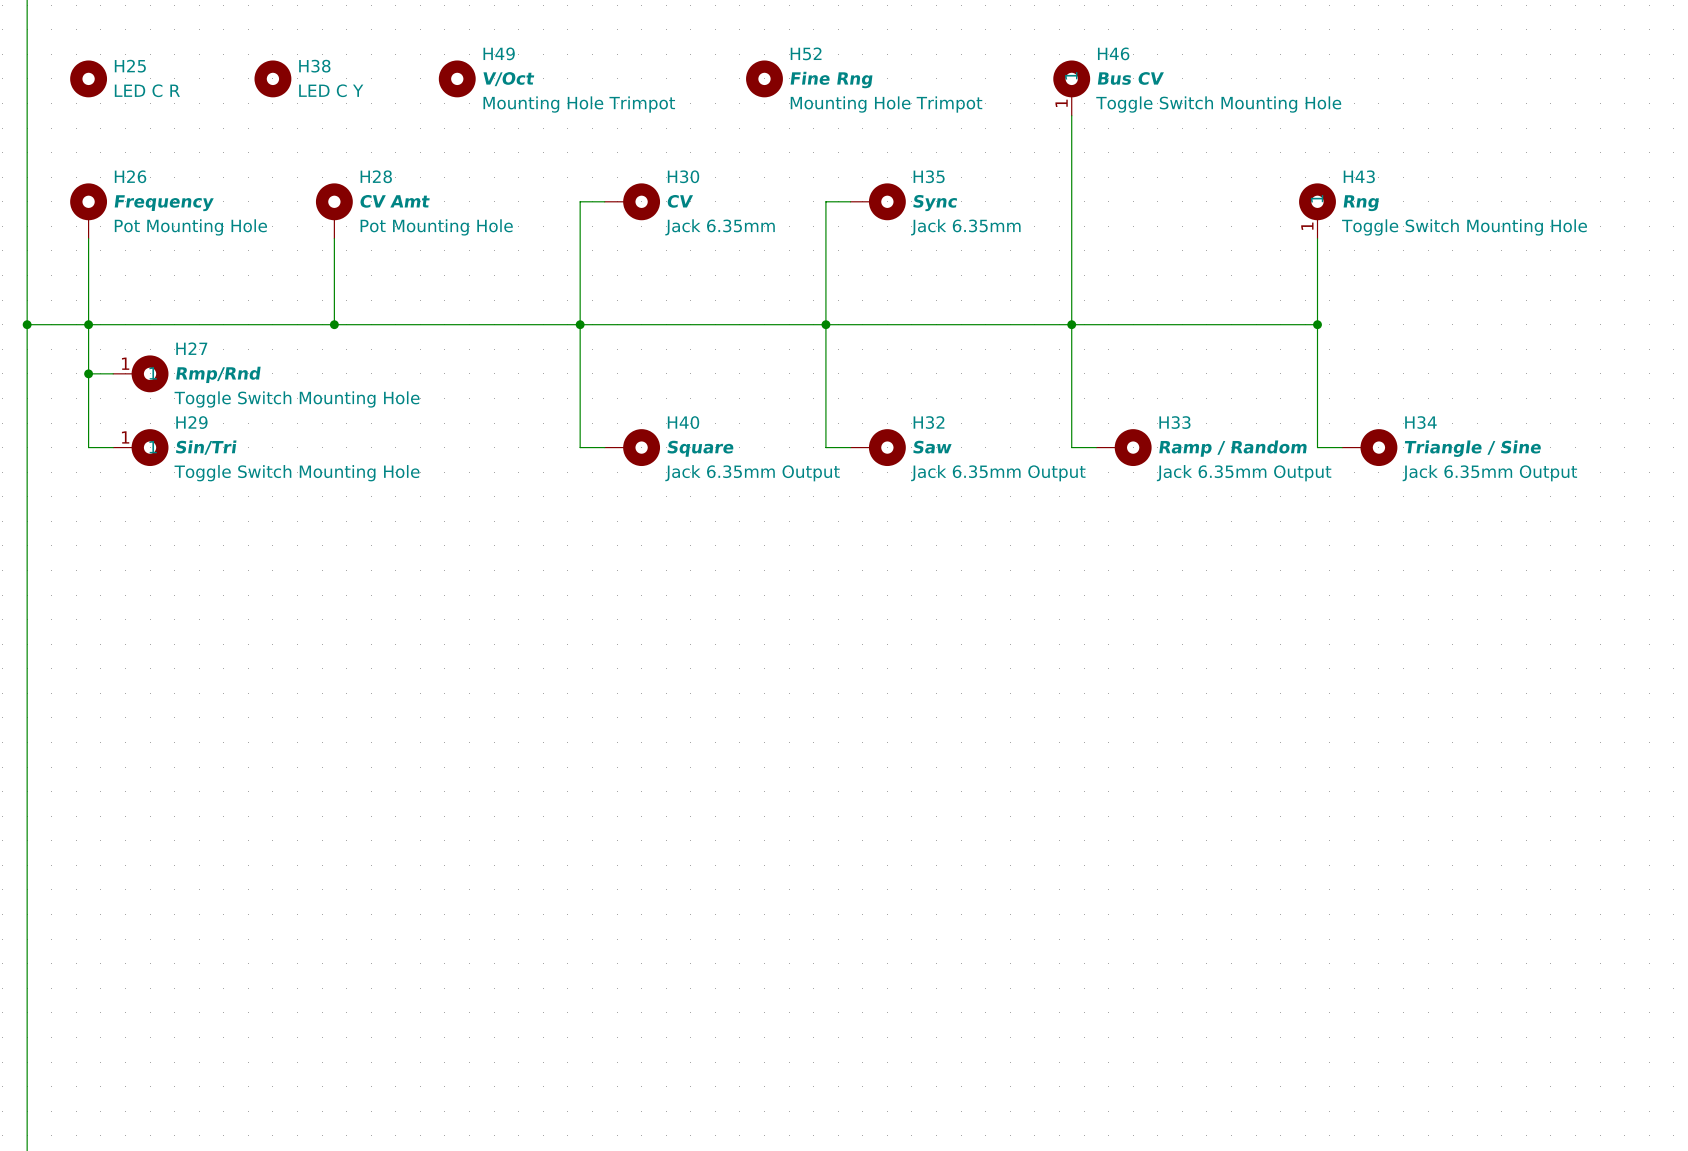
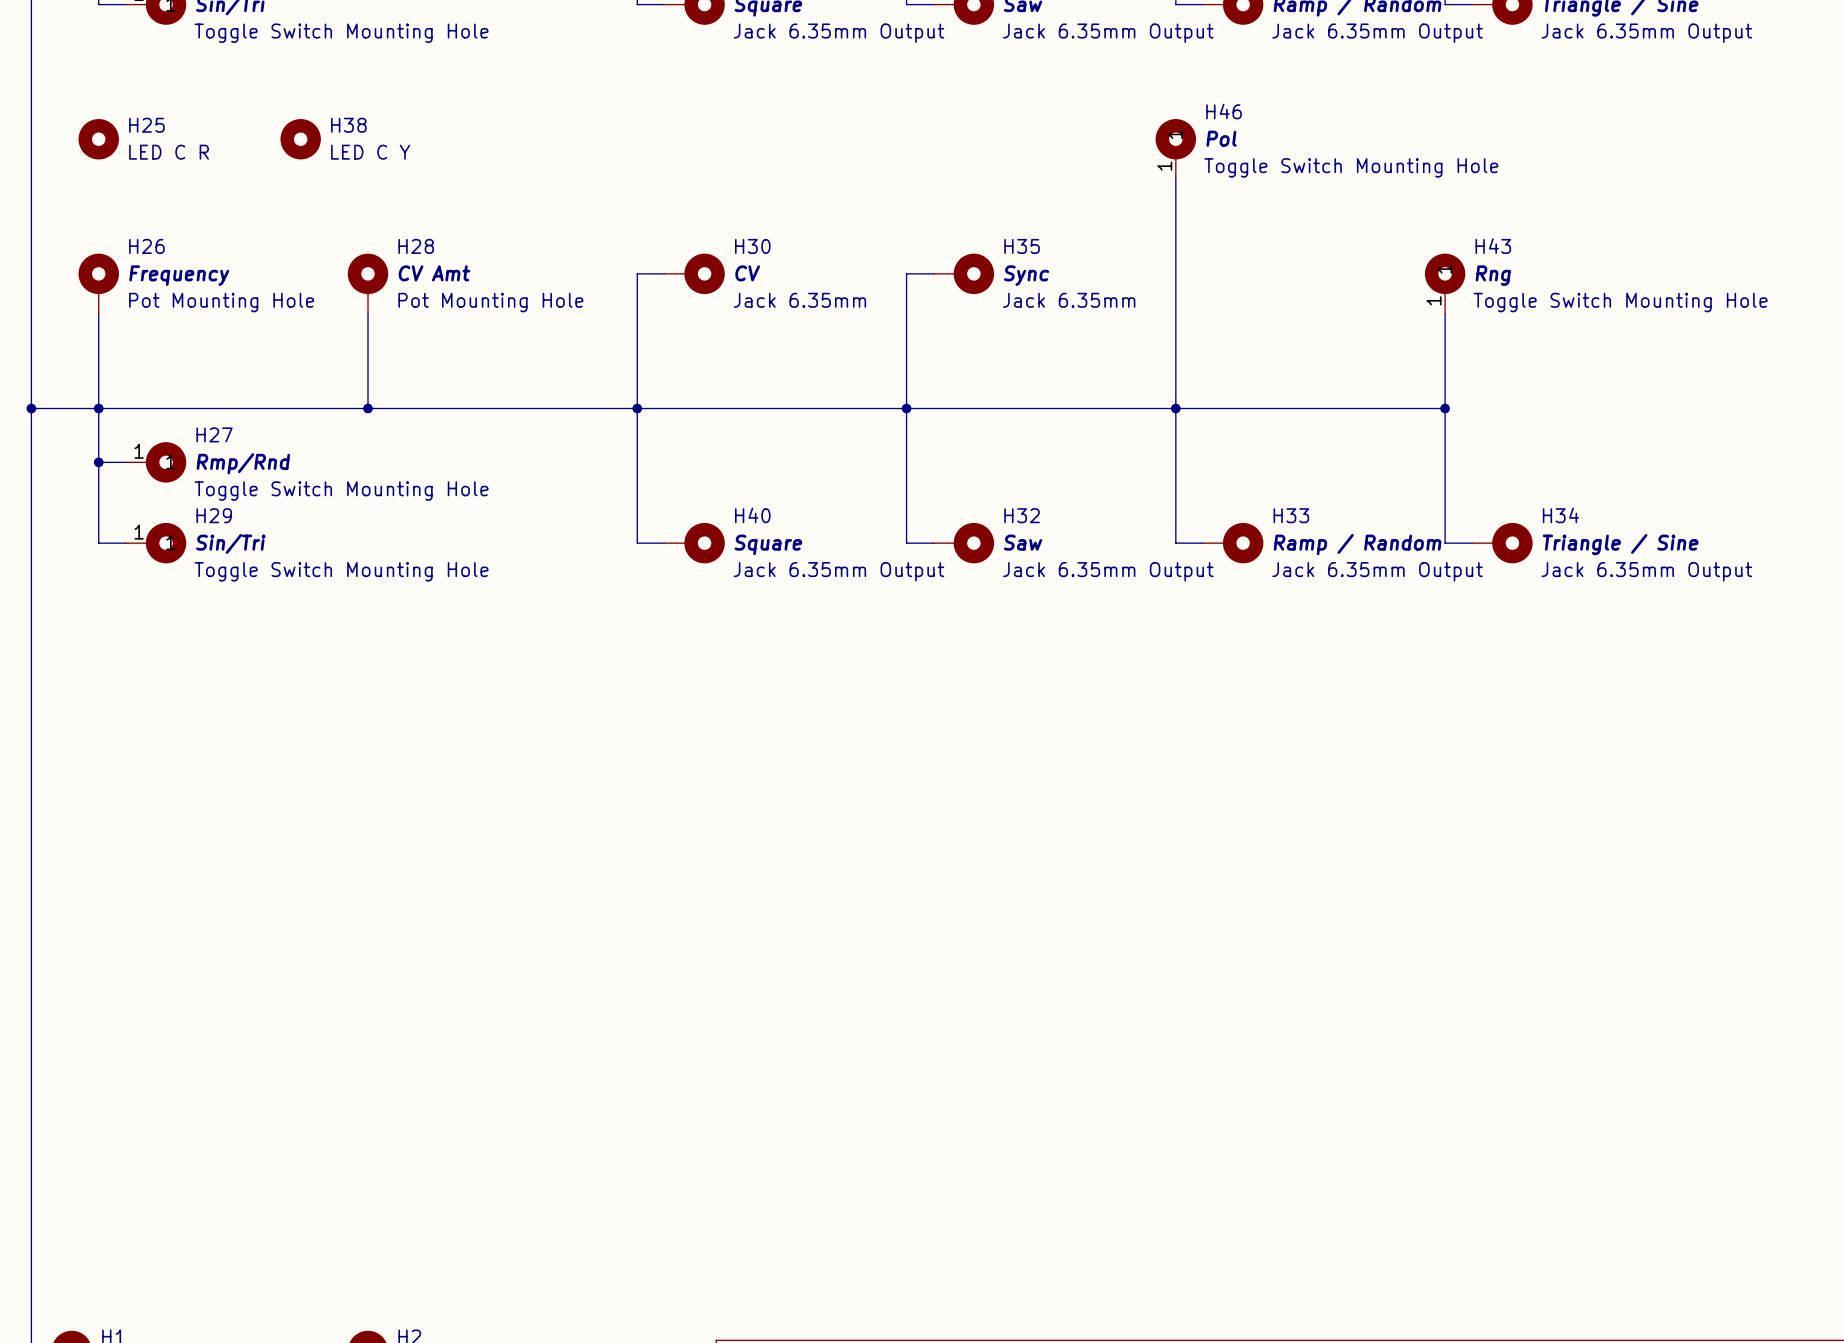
H49: V/Oct (457, 78) -> none
H52: Fine Rng (764, 78) -> none
H46 value: Bus CV (1130, 78) -> Pol (1221, 138)

